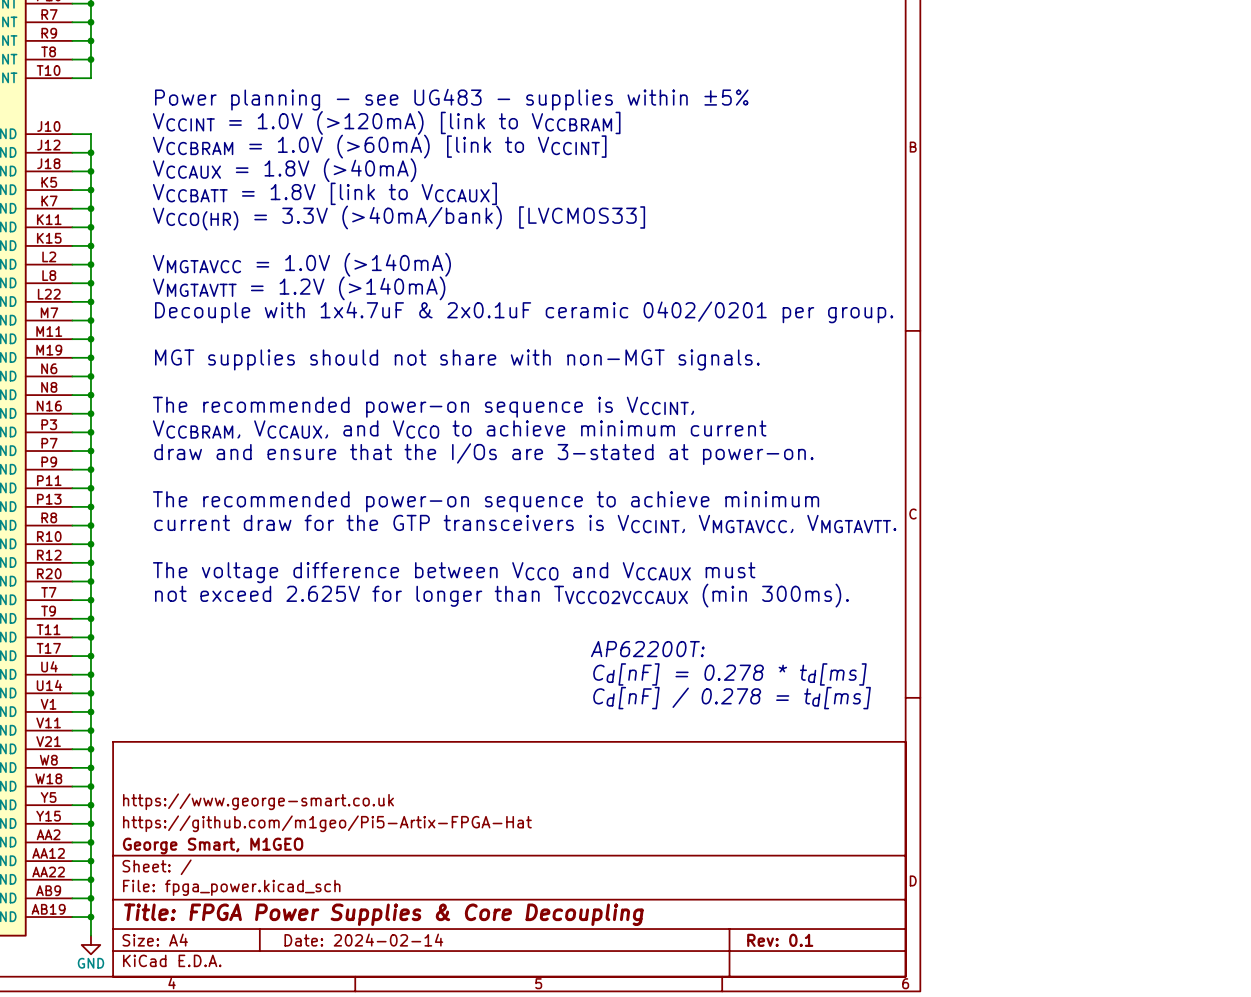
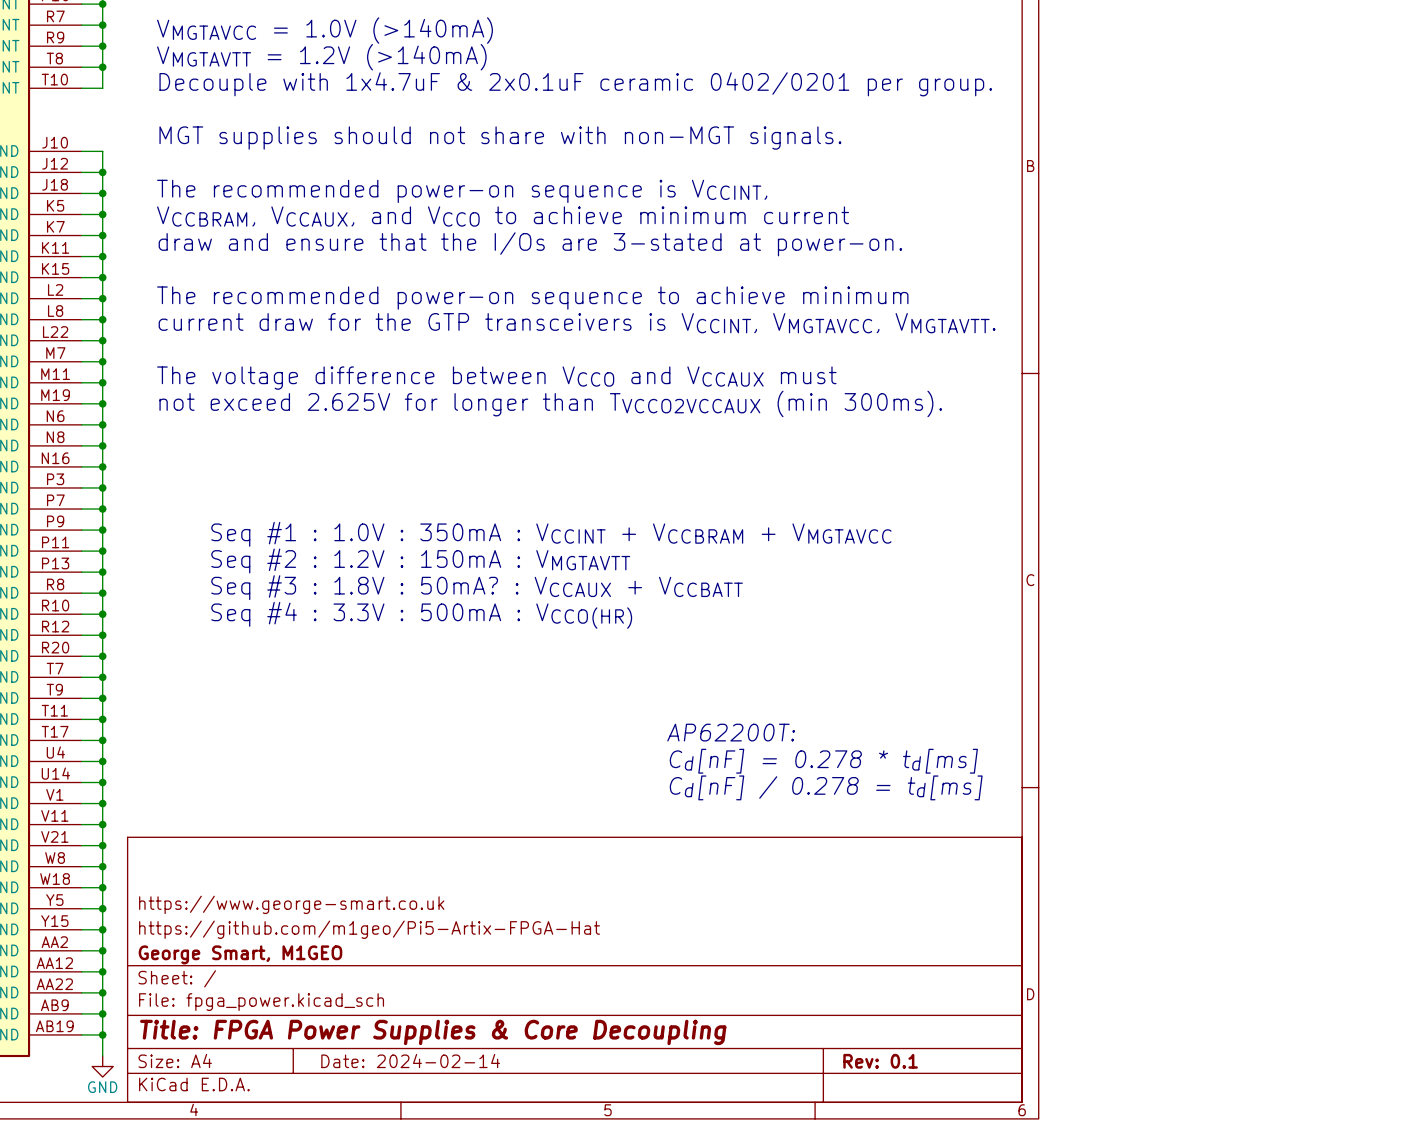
text: none -> VMGTAVCC = 1.0V (>140mA) (324, 30)
text: none -> VMGTAVTT = 1.2V (>140mA) (321, 57)
text: none -> Decouple with 1x4.7uF & 2x0.1uF ceramic 0402/0201 per group. (575, 84)
text: Power planning - see UG483 - supplies within ±5% (451, 99) -> none
text: VCCINT = 1.0V (>120mA) [link to VCCBRAM] (386, 122) -> none
text: none -> MGT supplies should not share with non-MGT signals. (500, 138)
text: VCCBRAM = 1.0V (>60mA) [link to VCCINT] (379, 146) -> none
text: none -> The recommended power-on sequence is VCCINT, (462, 191)
text: VCCAUX = 1.8V (>40mA) (284, 170) -> none
text: none -> VCCBRAM, VCCAUX, and VCCO to achieve minimum current (503, 216)
text: VCCBATT = 1.8V [link to VCCAUX] (324, 193) -> none
text: none -> draw and ensure that the I/Os are 3-stated at power-on. (530, 244)
text: VCCO(HR) = 3.3V (>40mA/bank) [LVCMOS33] (399, 218) -> none
text: VMGTAVCC = 1.0V (>140mA) (301, 264) -> none
text: none -> The recommended power-on sequence to achieve minimum (532, 298)
text: none -> current draw for the GTP transceivers is VCCINT, VMGTAVCC, VMGTAVTT. (577, 323)
text: VMGTAVTT = 1.2V (>140mA) (299, 288) -> none
text: Decouple with 1x4.7uF & 2x0.1uF ceramic 0402/0201 per group. (524, 312) -> none
text: none -> The voltage difference between VCCO and VCCAUX must (496, 378)
text: none -> not exceed 2.625V for longer than TVCCO2VCCAUX (min 300ms). (550, 403)
text: MGT supplies should not share with non-MGT signals. (457, 359) -> none
text: The recommended power-on sequence is VCCINT, (423, 407) -> none
text: VCCBRAM, VCCAUX, and VCCO to achieve minimum current (459, 429) -> none
text: draw and ensure that the I/Os are 3-stated at power-on. (483, 454) -> none
text: none -> Seq #1 : 1.0V : 350mA : VCCINT + VCCBRAM + VMGTAVCC (551, 534)
text: none -> Seq #2 : 1.2V : 150mA : VMGTAVTT (420, 560)
text: The recommended power-on sequence to achieve minimum (486, 501) -> none
text: none -> Seq #3 : 1.8V : 50mA? : VCCAUX + VCCBATT (477, 587)
text: current draw for the GTP transceivers is VCCINT, VMGTAVCC, VMGTAVTT. (525, 524) -> none
text: none -> Seq #4 : 3.3V : 500mA : VCCO(HR) (421, 615)
text: The voltage difference between VCCO and VCCAUX must (454, 572) -> none
text: not exceed 2.625V for longer than TVCCO2VCCAUX (min 300ms). (501, 595) -> none

